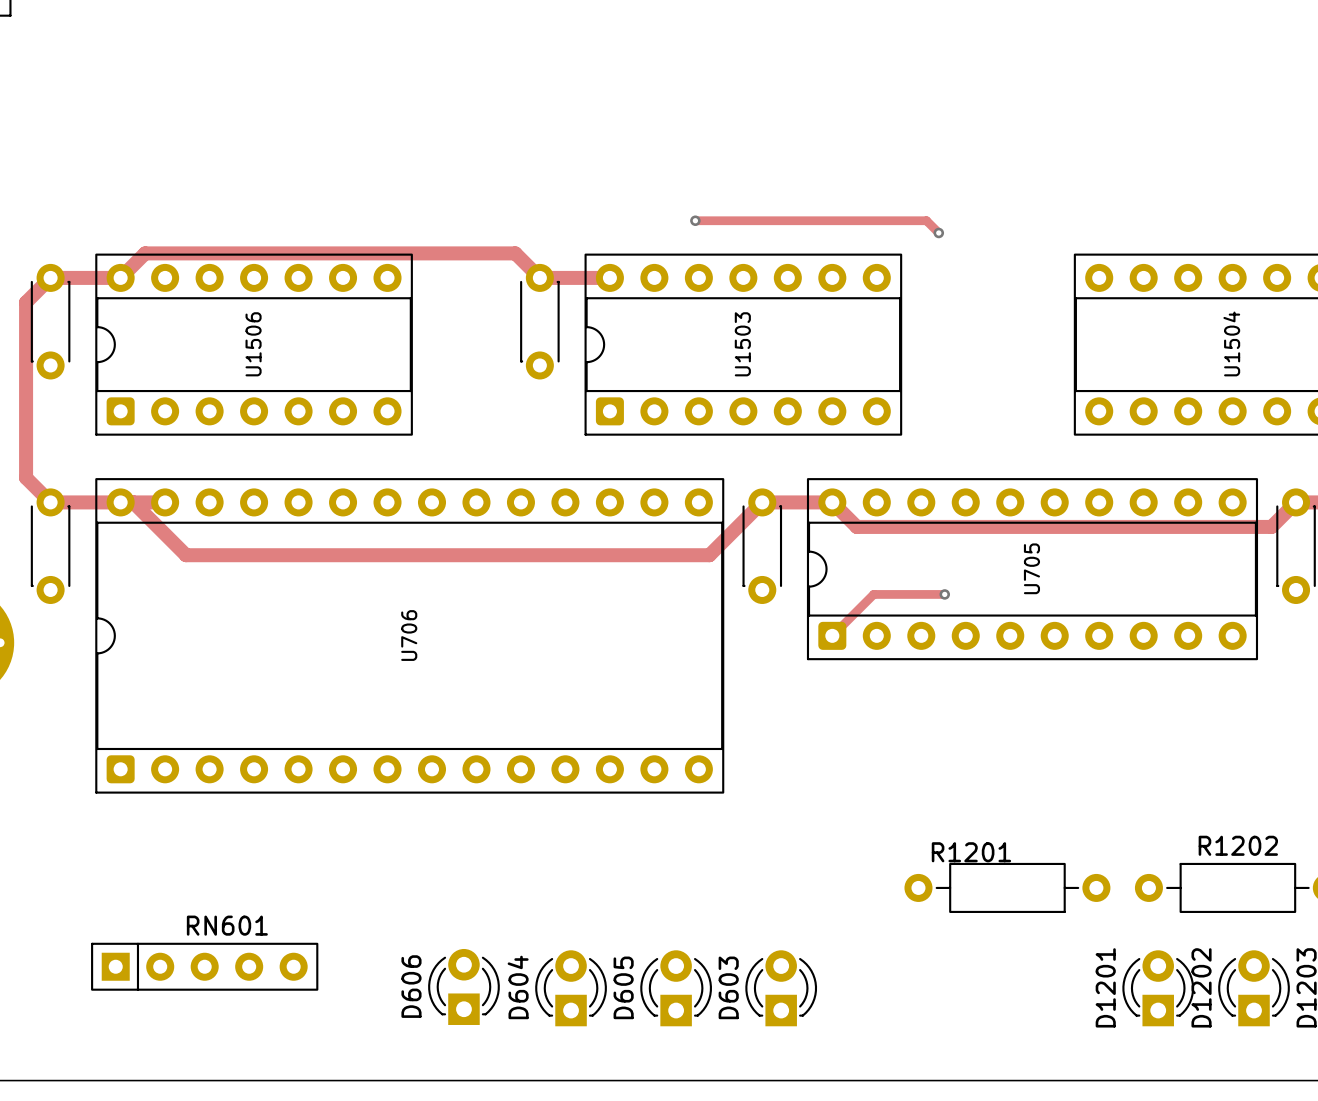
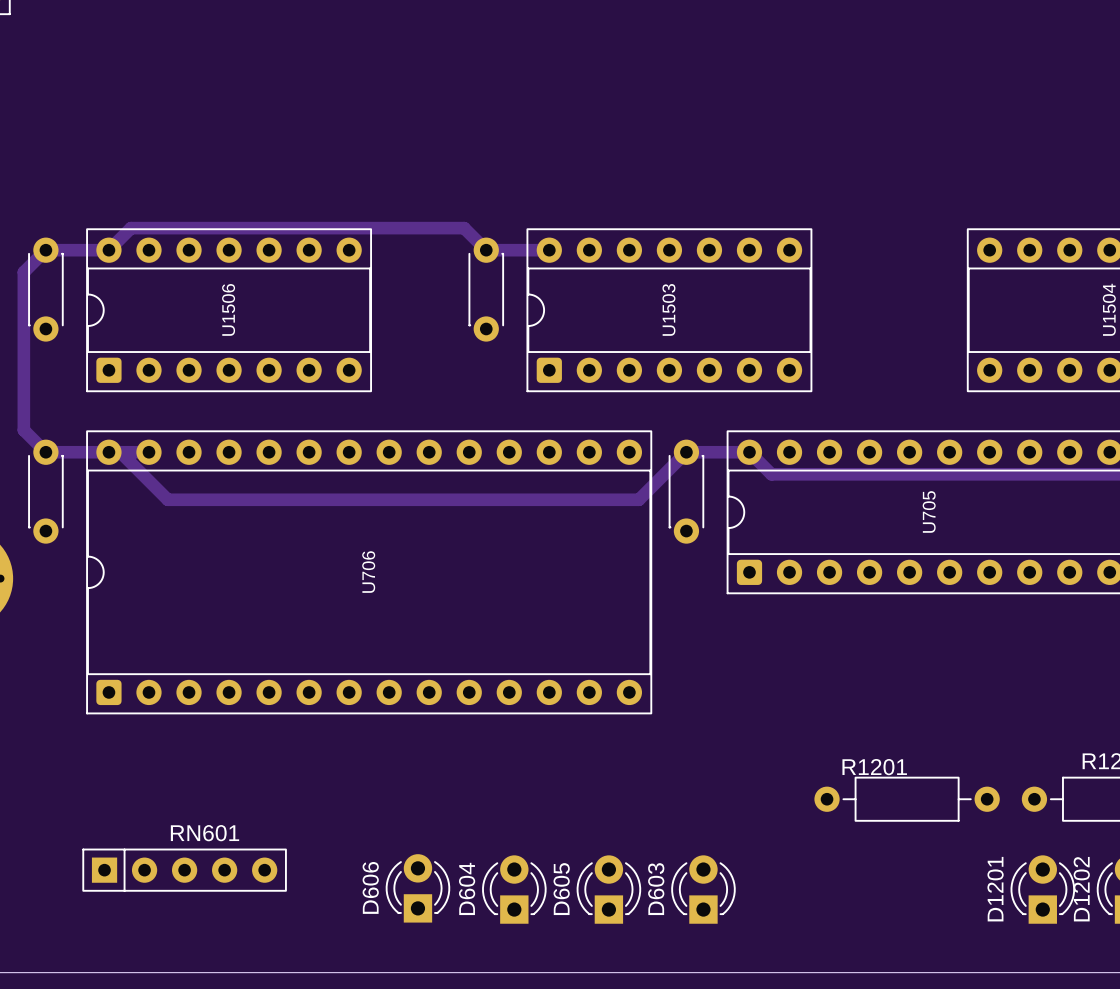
track: (695, 220) (926, 220) (938, 232) -> none
via: (695, 220) -> none
via: (938, 232) -> none
track: (944, 594) (873, 594) (832, 635) -> none
via: (944, 594) -> none

